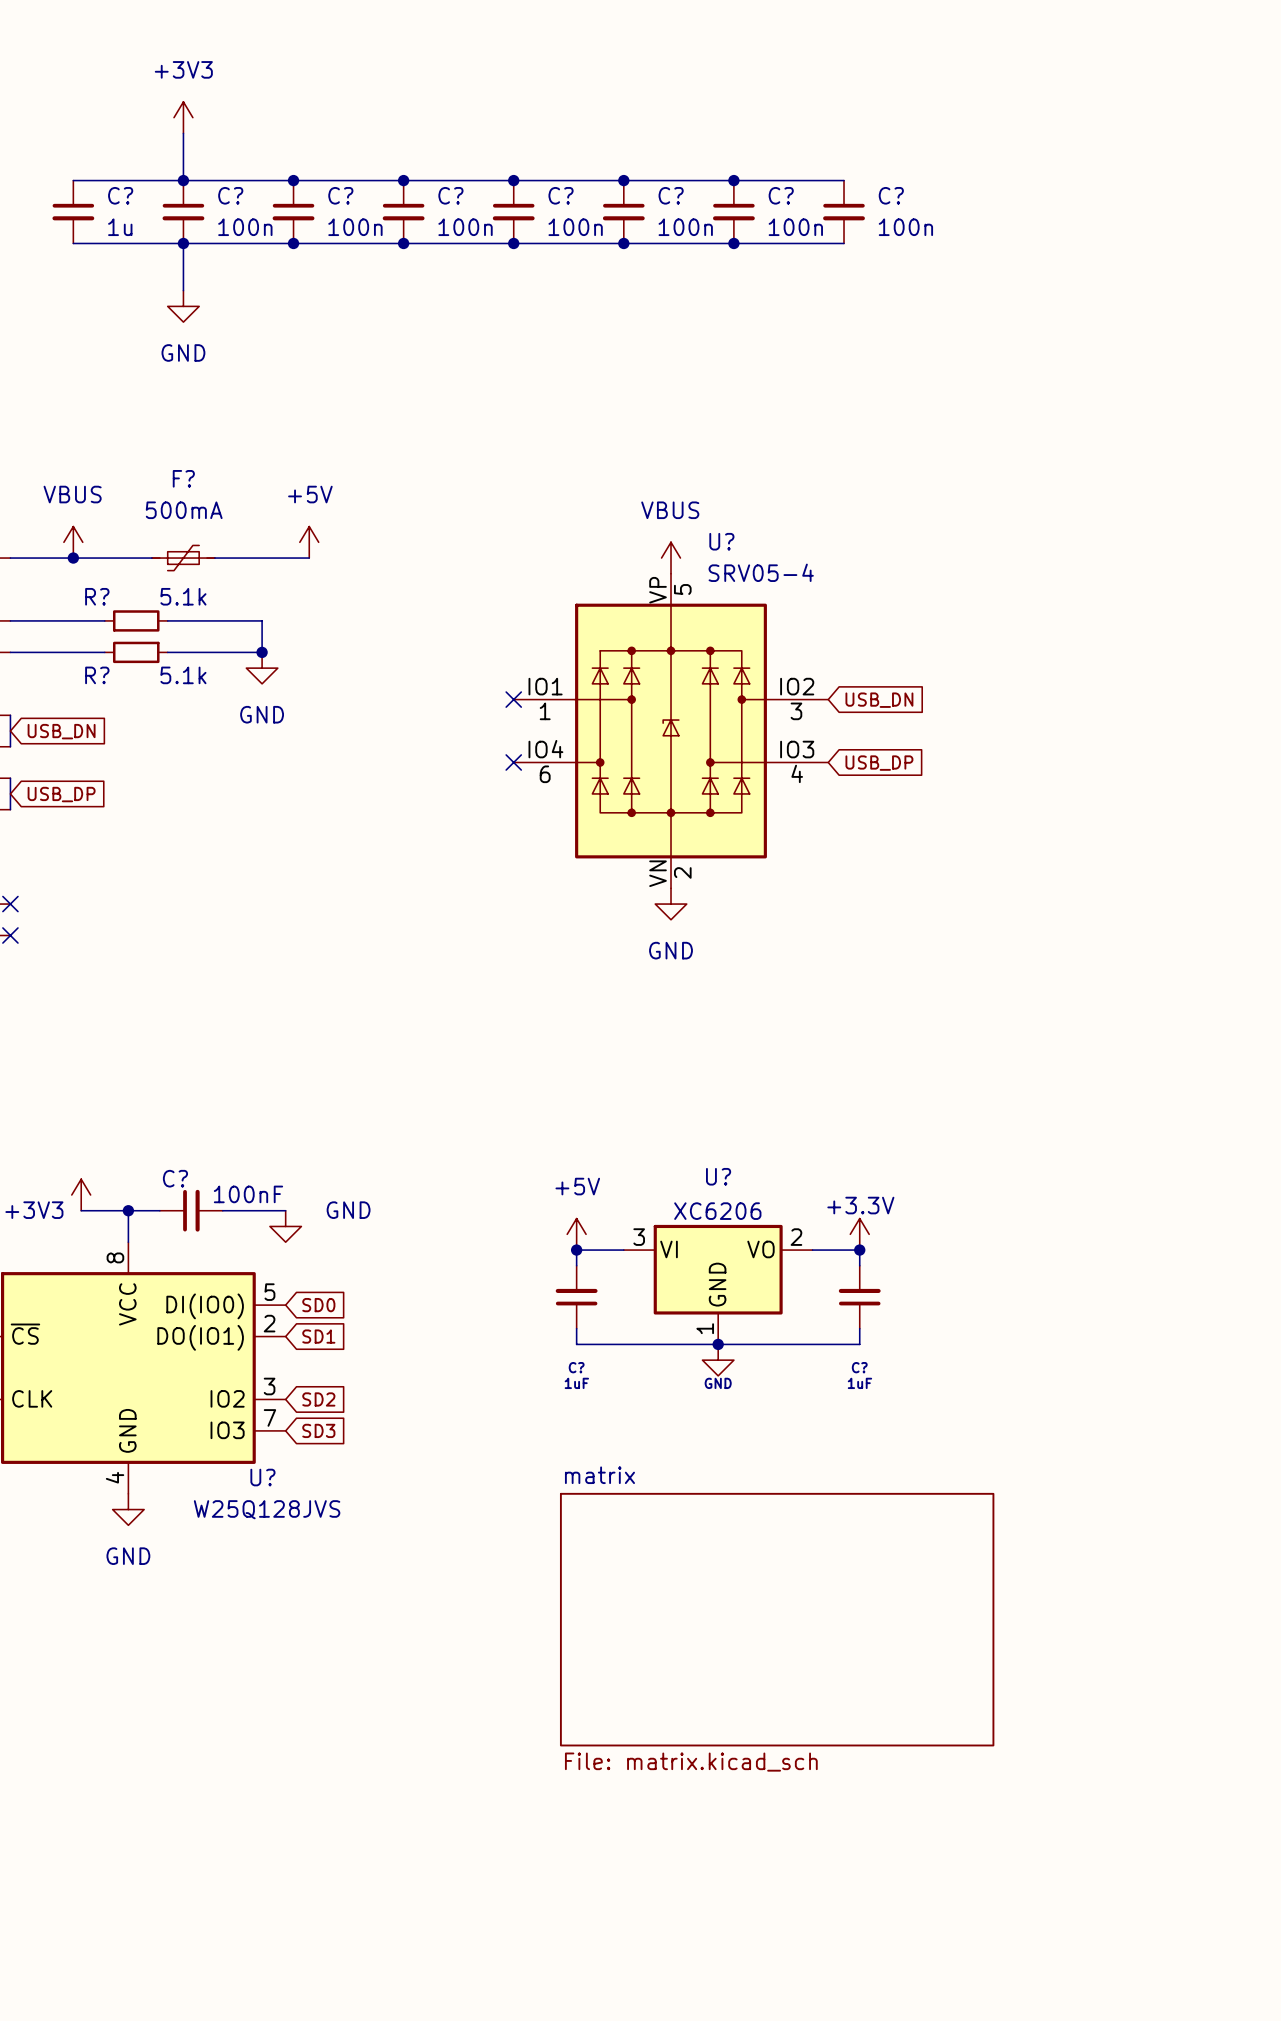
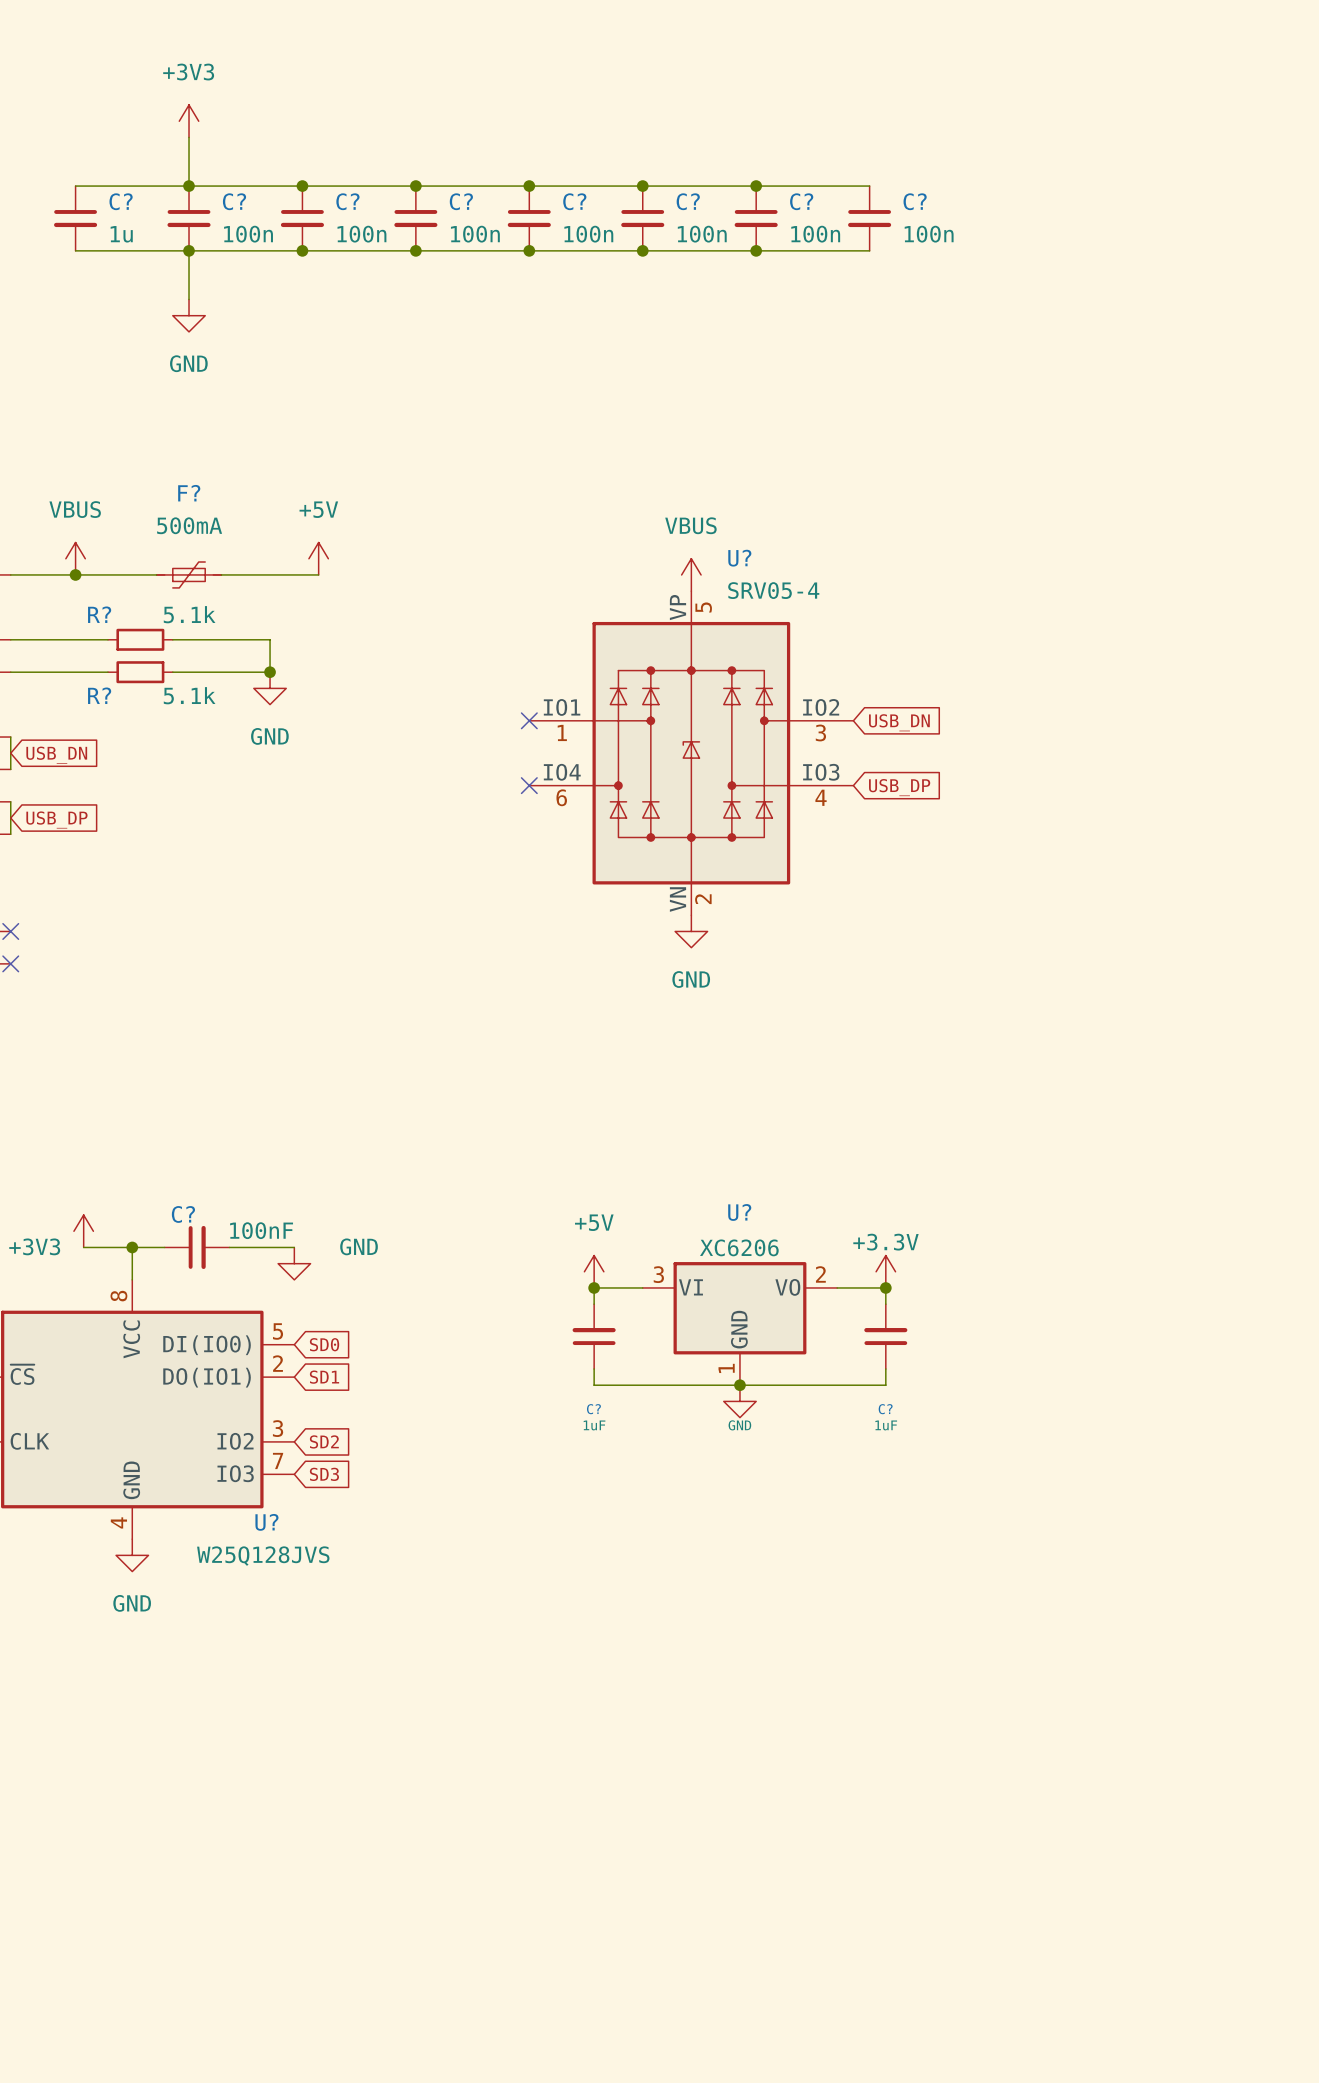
sheet matrix: File: matrix.kicad_sch (777, 1619) -> none

